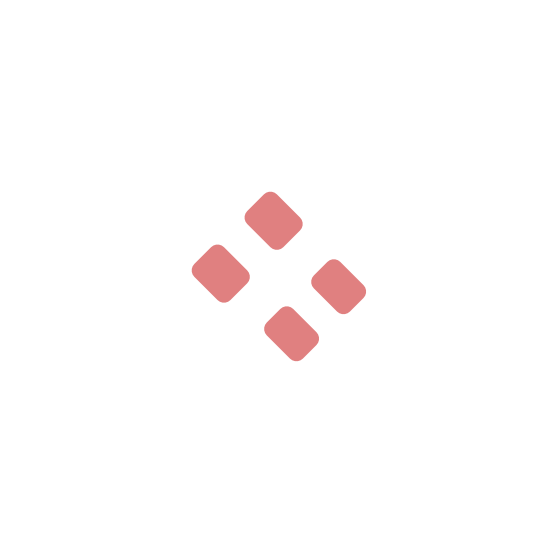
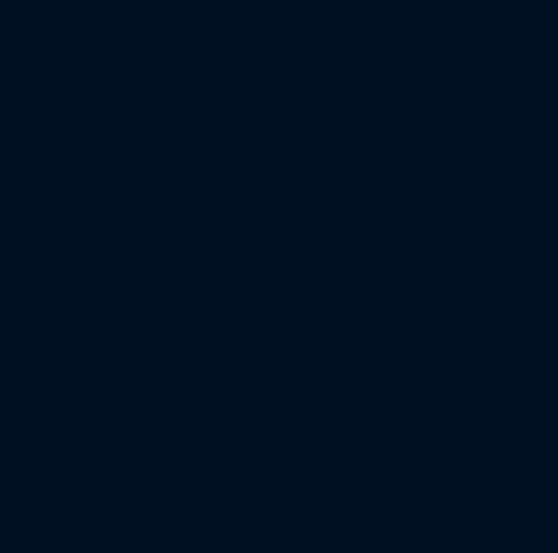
part: (247, 247) -> none
part: (315, 310) -> none

